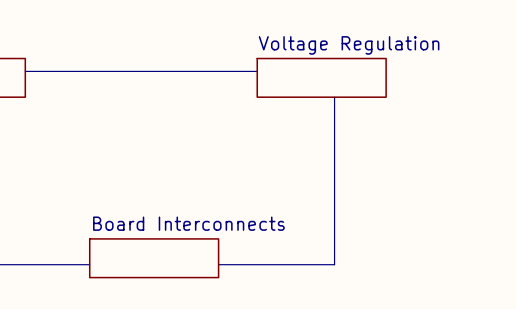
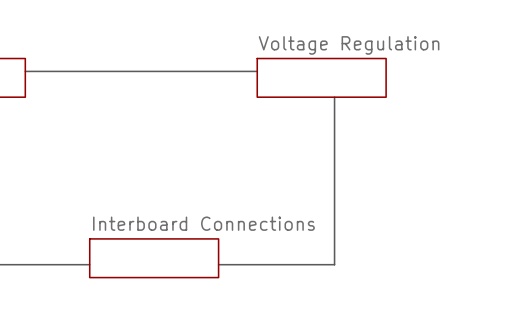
sheet Board Interconnects name: Board Interconnects (188, 223) -> Interboard Connections (203, 223)

